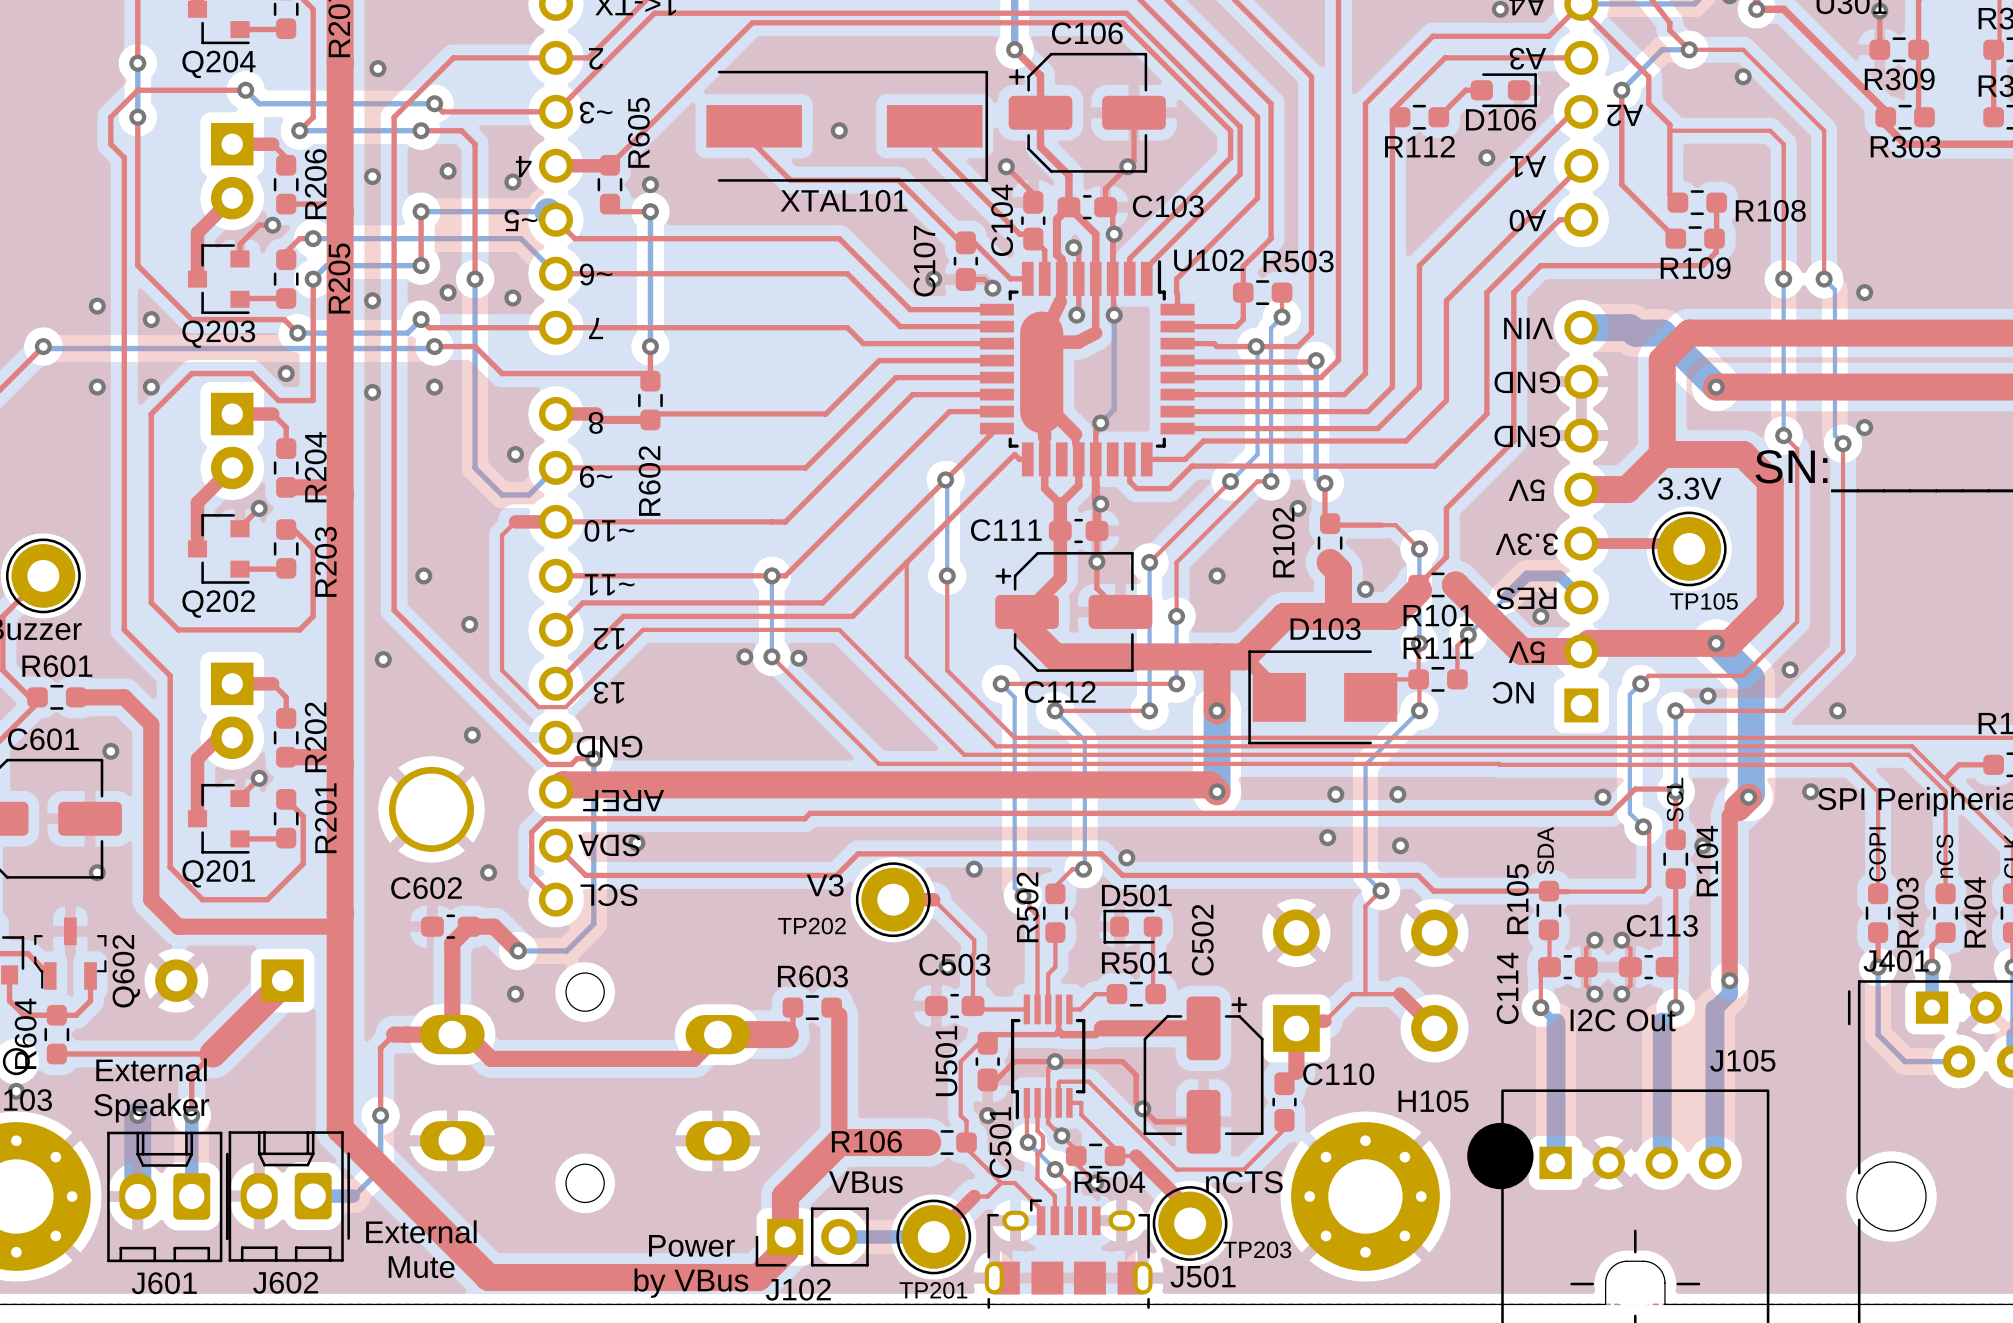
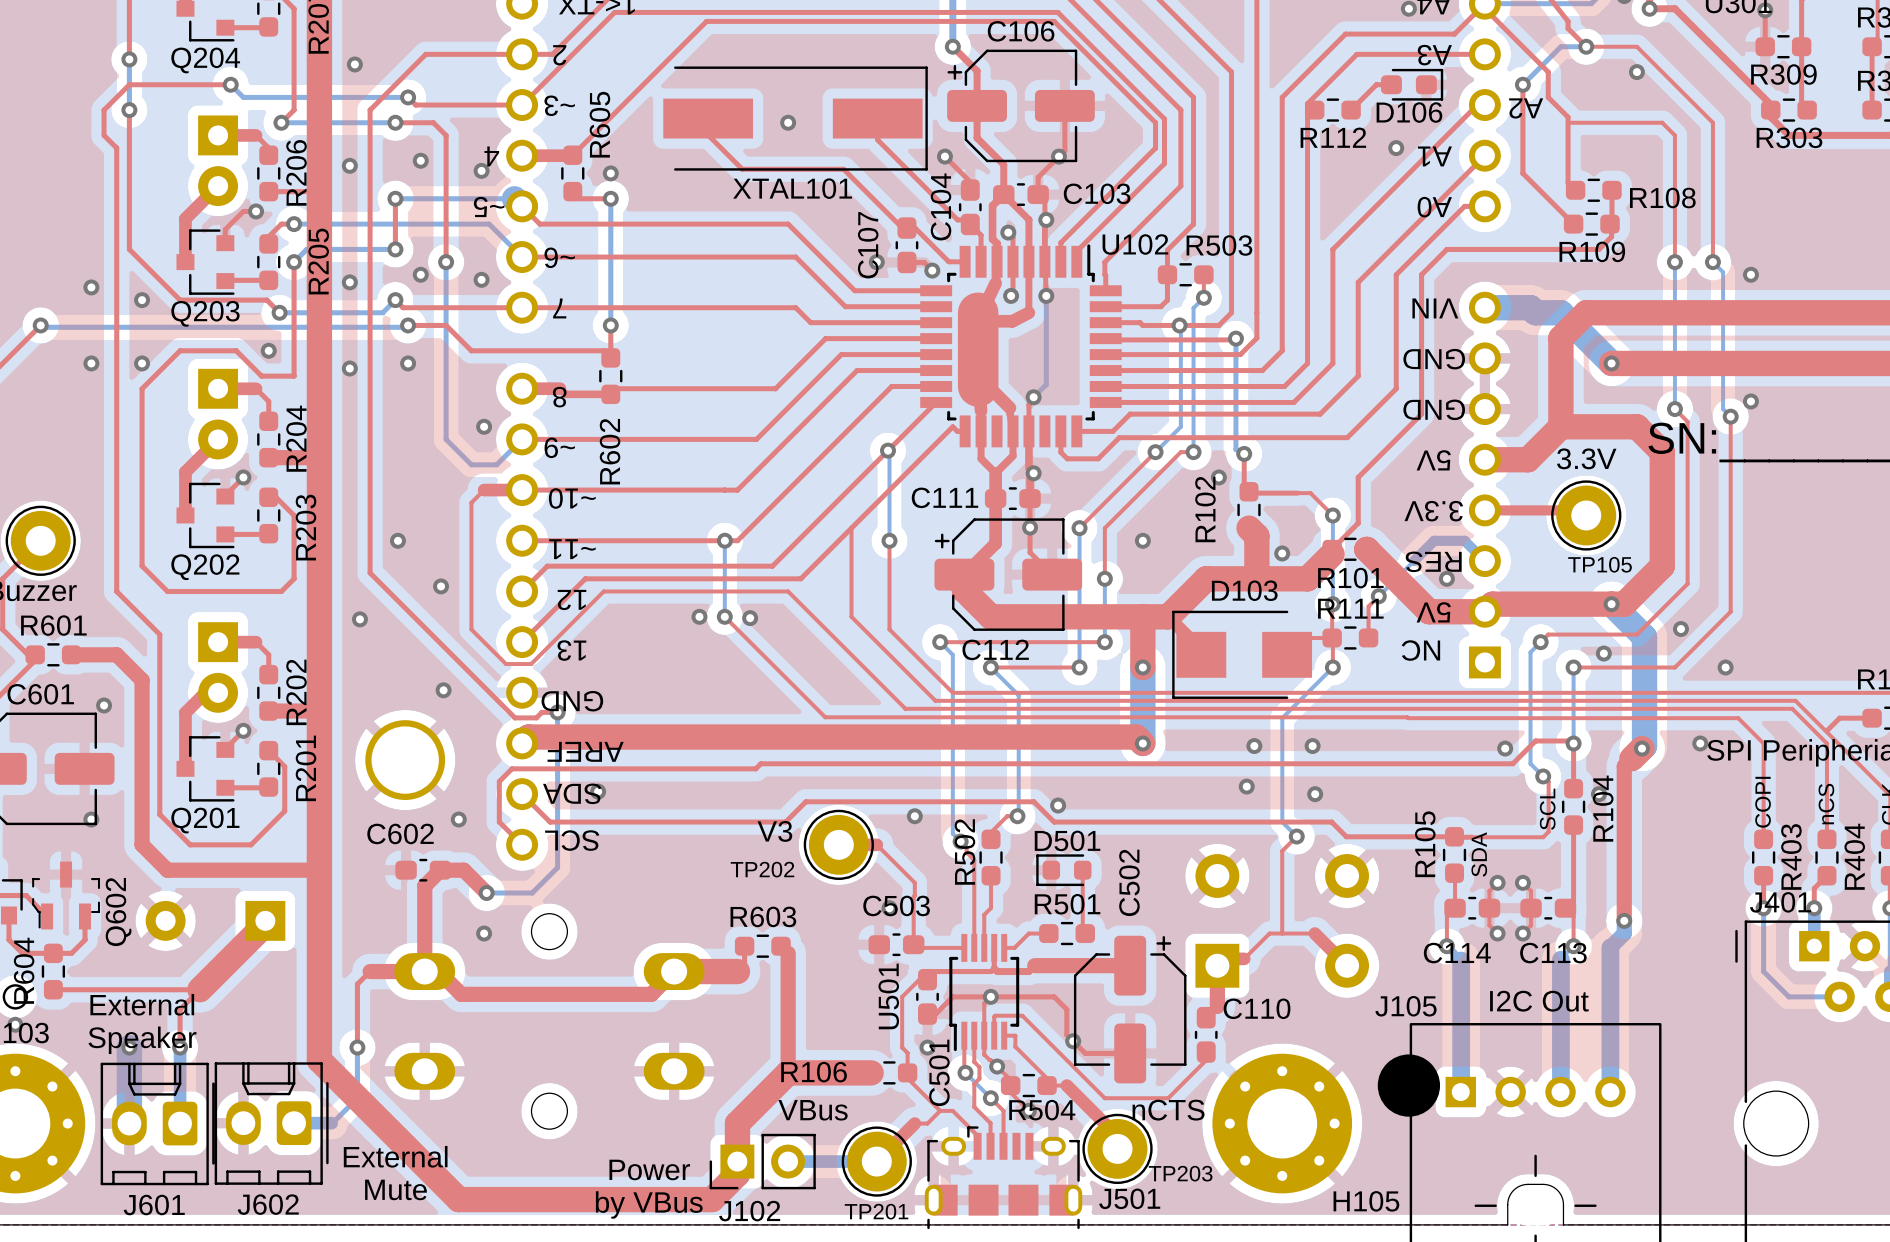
text position: SCL (1675, 799) -> SCL (1547, 809)
text position: SDA (1545, 850) -> SDA (1479, 854)
C113 name position: C113 (1662, 925) -> C113 (1553, 953)
C114 name rotation: 0° (1507, 988) -> 90° clockwise (1457, 953)
text position: I2C Out (1623, 1020) -> I2C Out (1539, 1001)
J105 name position: J105 (1742, 1060) -> J105 (1405, 1006)
H105 name position: H105 (1433, 1101) -> H105 (1366, 1201)

